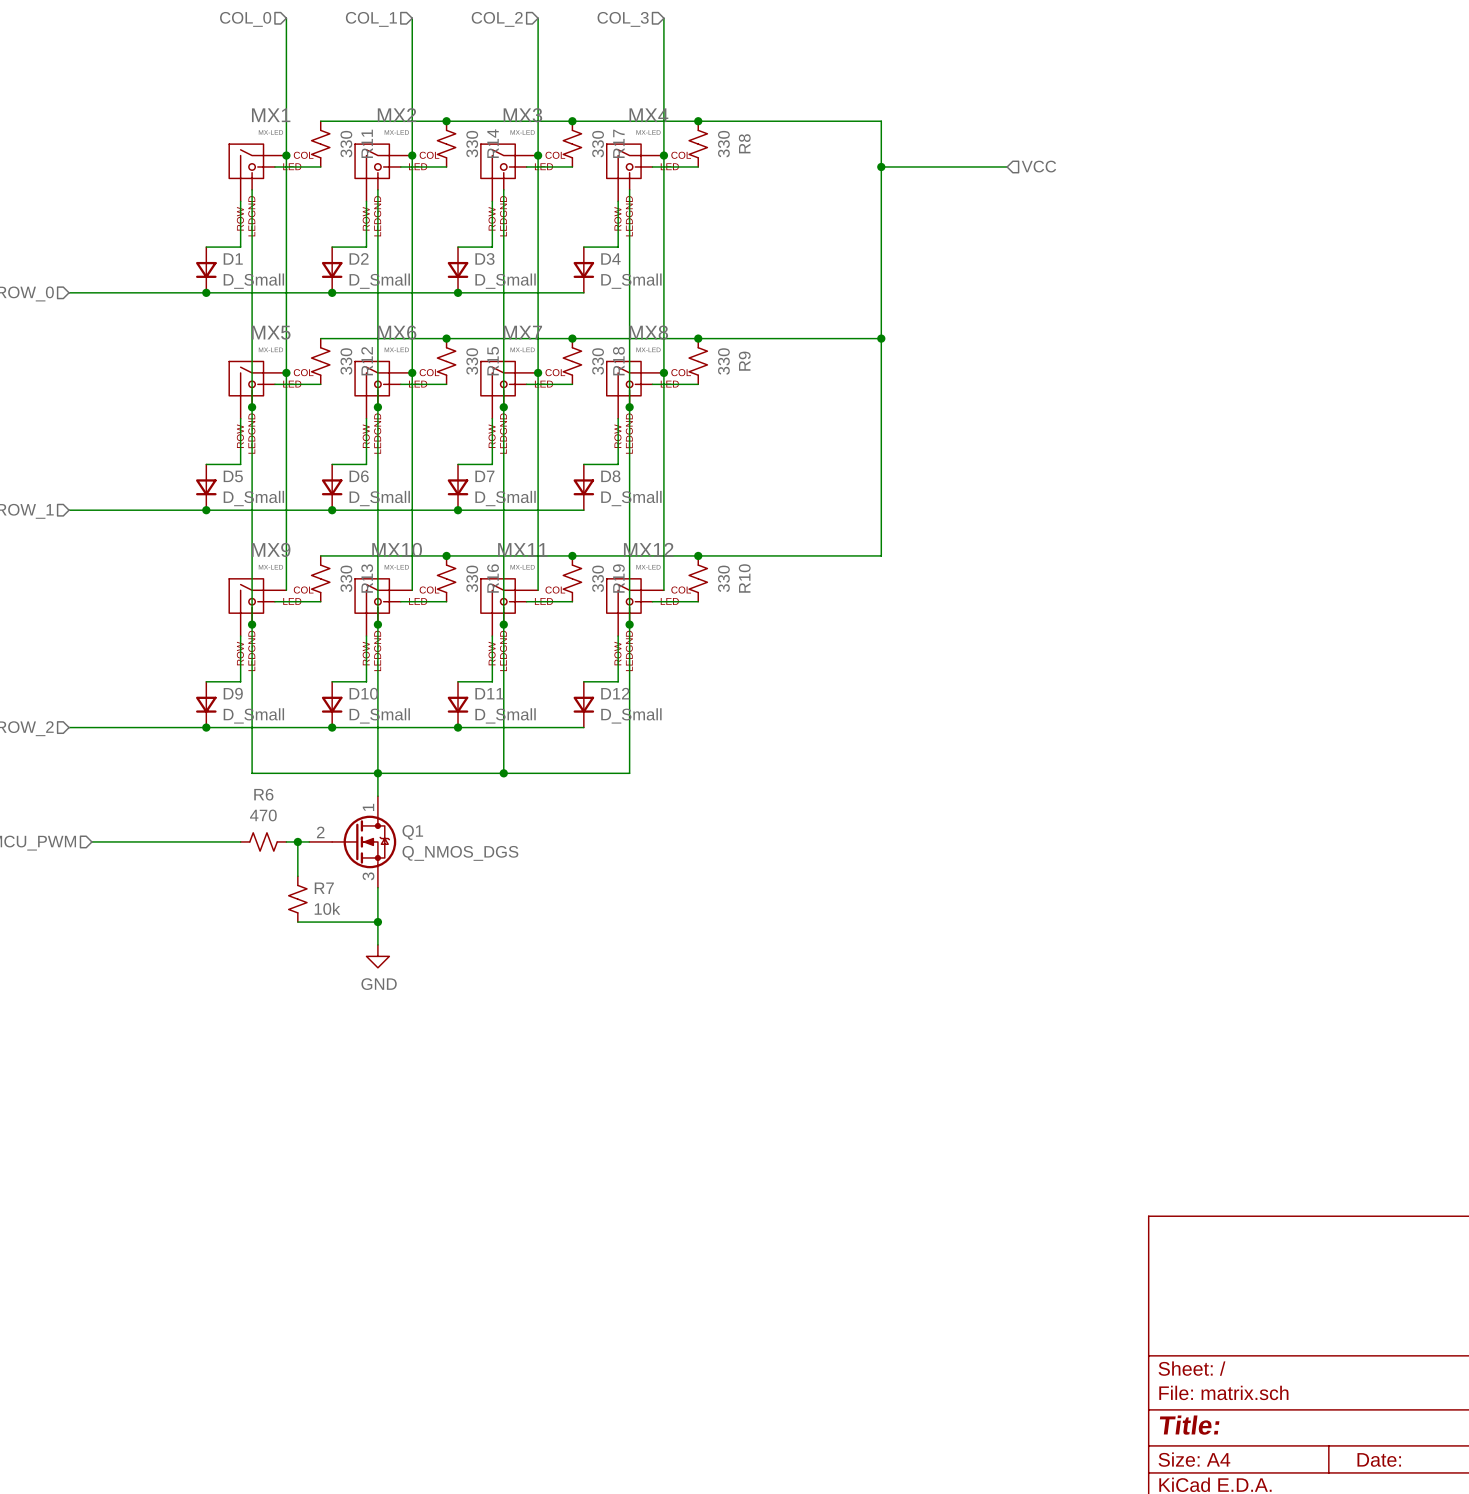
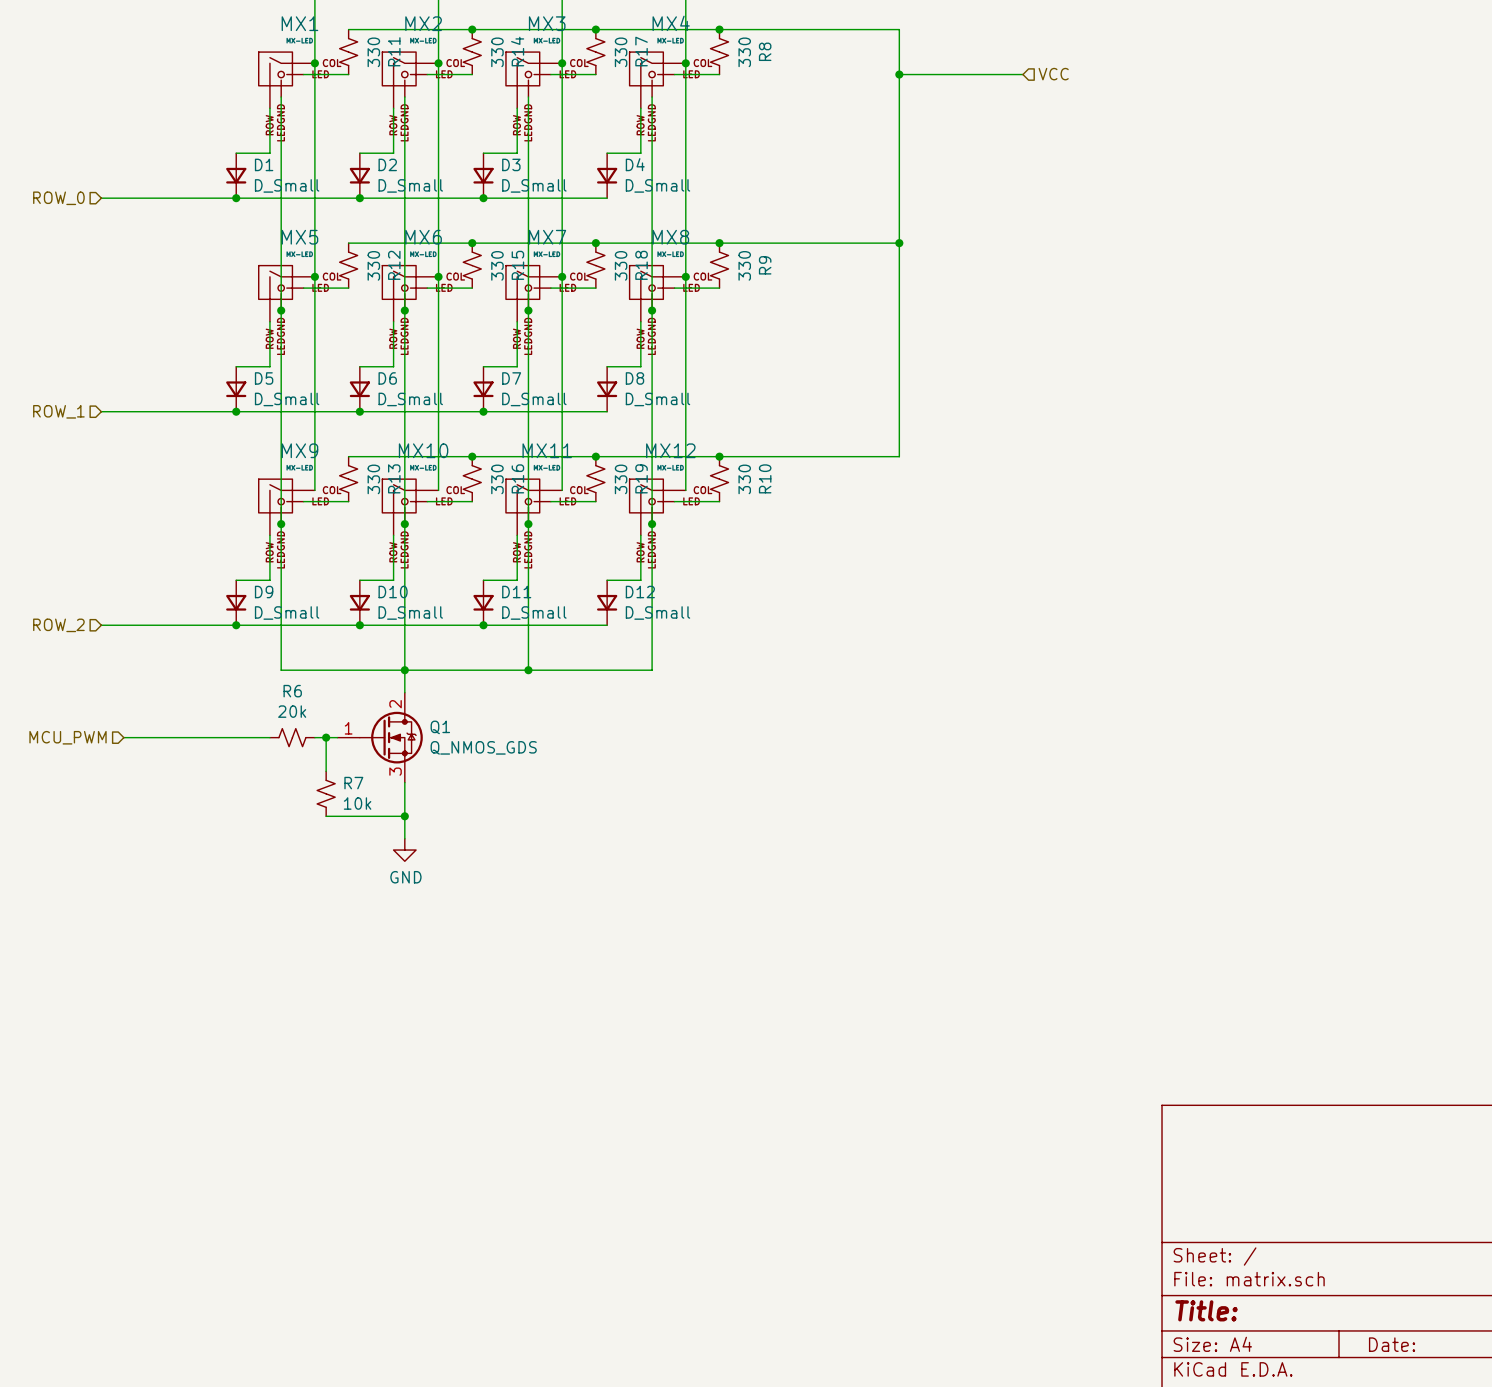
Q1 pin number: 1 (368, 807) -> 2 (395, 704)
R6 value: 470 (263, 815) -> 20k (292, 711)
Q1 pin number: 2 (320, 832) -> 1 (348, 728)
Q1 value: Q_NMOS_DGS (460, 853) -> Q_NMOS_GDS (483, 747)

